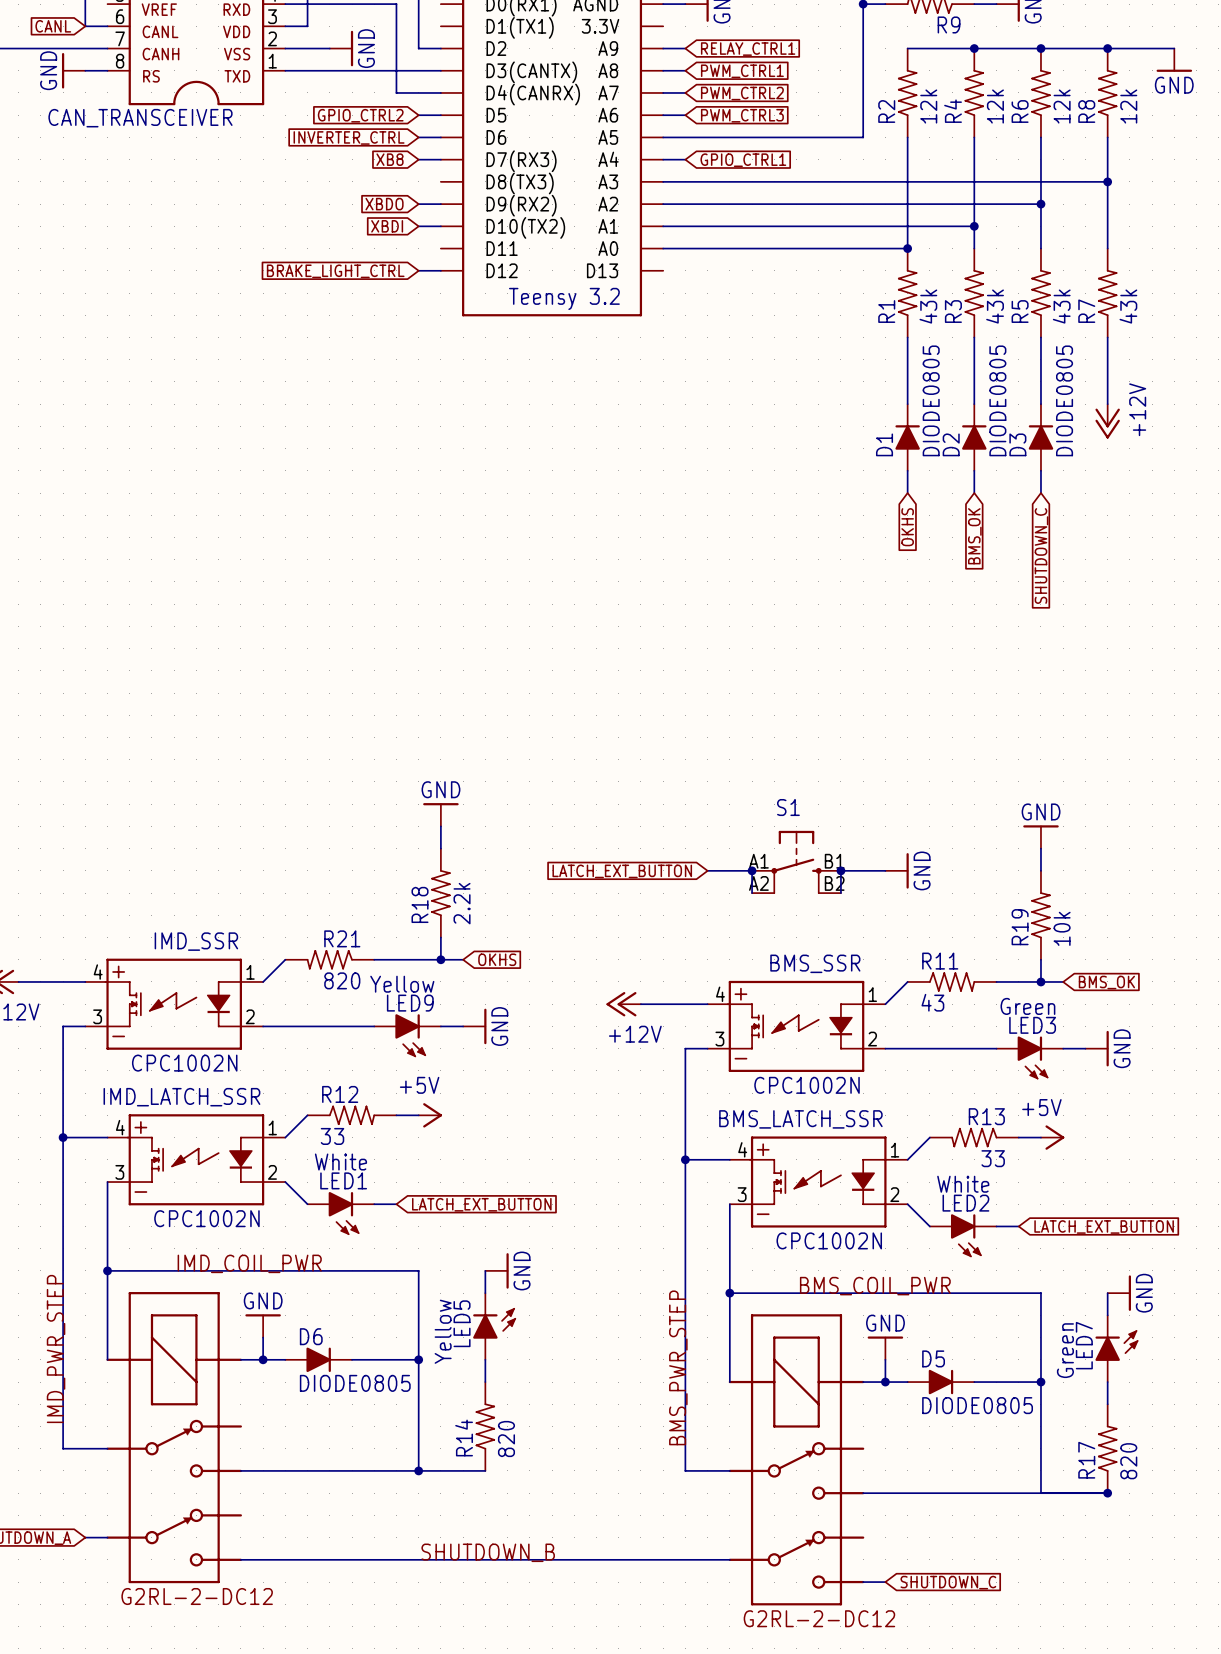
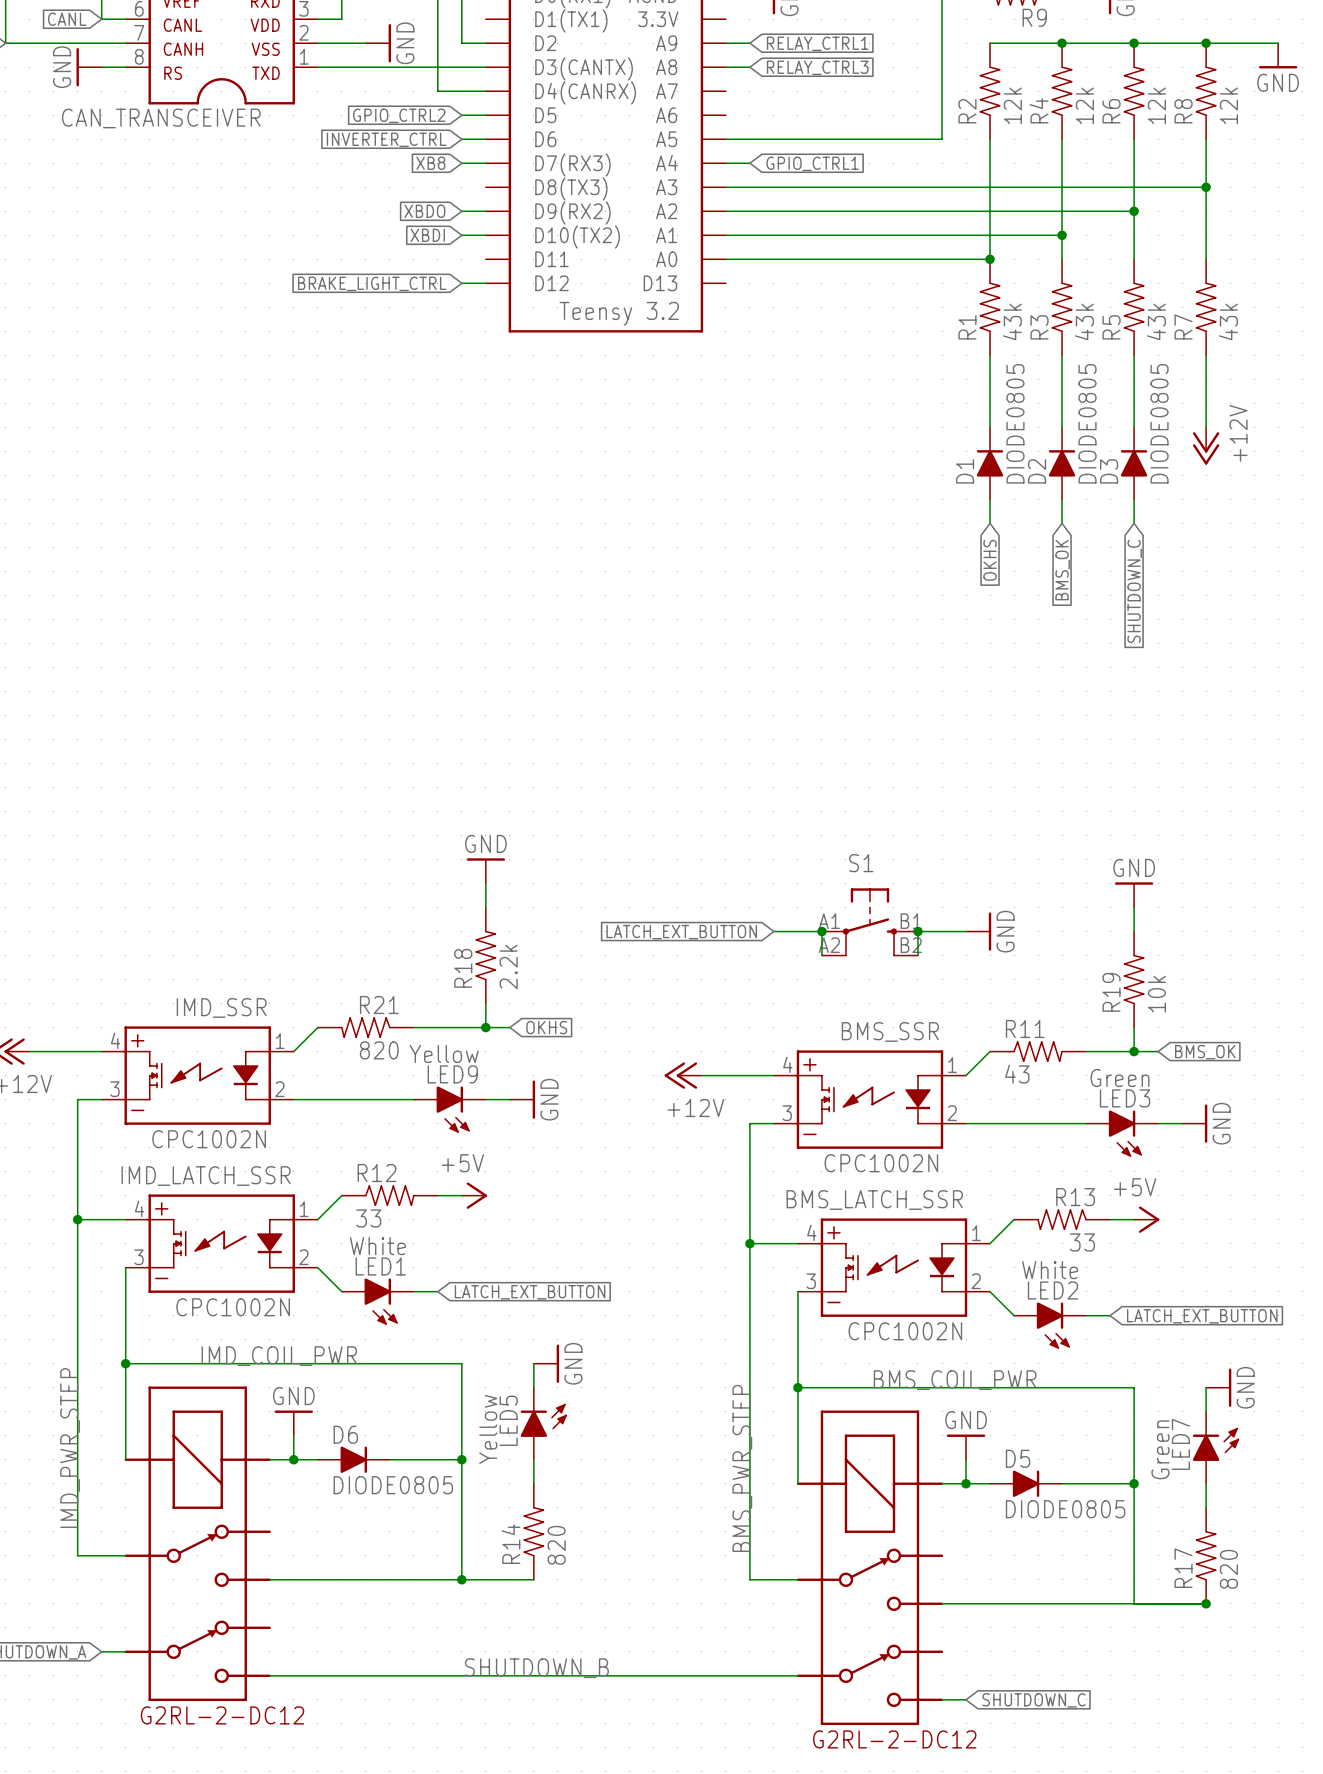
global label: PWM_CTRL1 (742, 71) -> RELAY_CTRL3 (817, 67)
wire: (663, 92) (685, 92) -> none
global label: PWM_CTRL2 (742, 93) -> none
wire: (663, 115) (685, 115) -> none
global label: PWM_CTRL3 (742, 115) -> none

